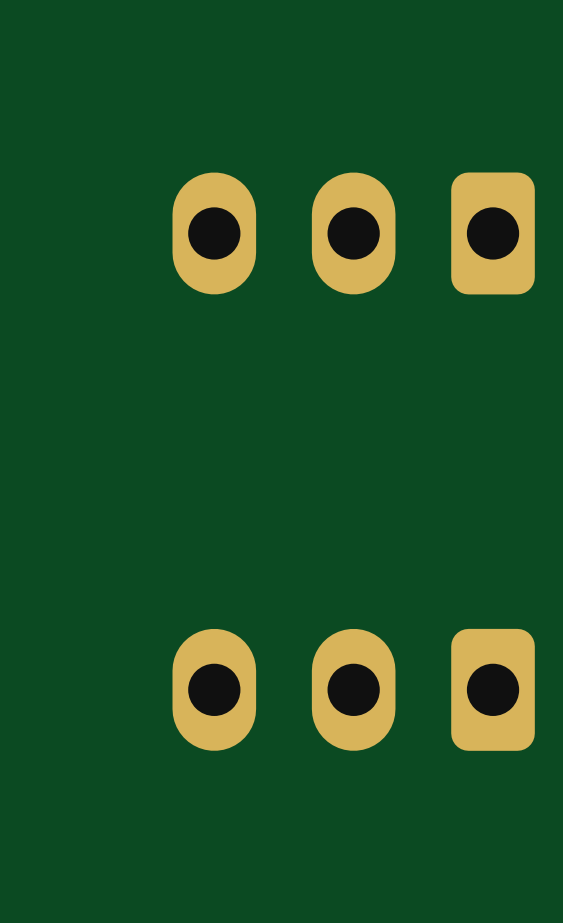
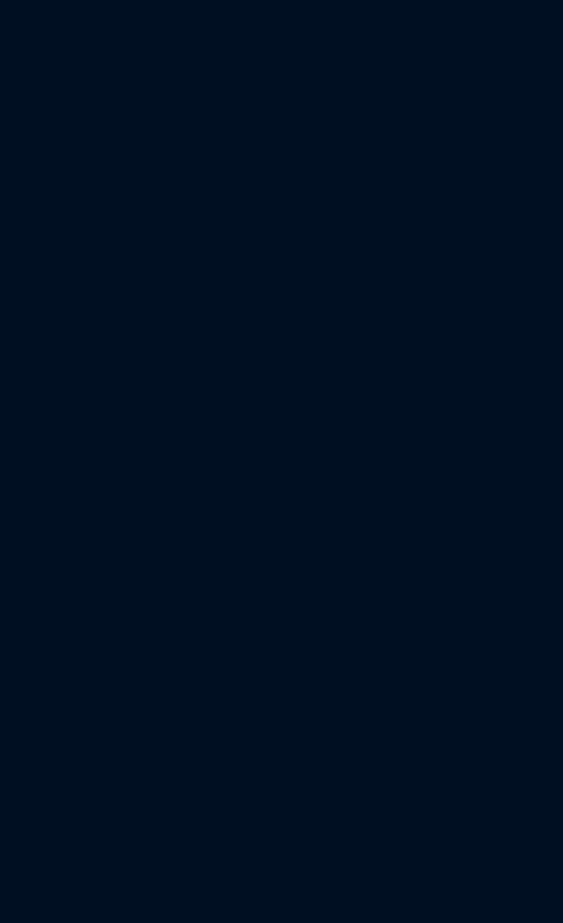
part: (353, 233) -> none
part: (353, 689) -> none

